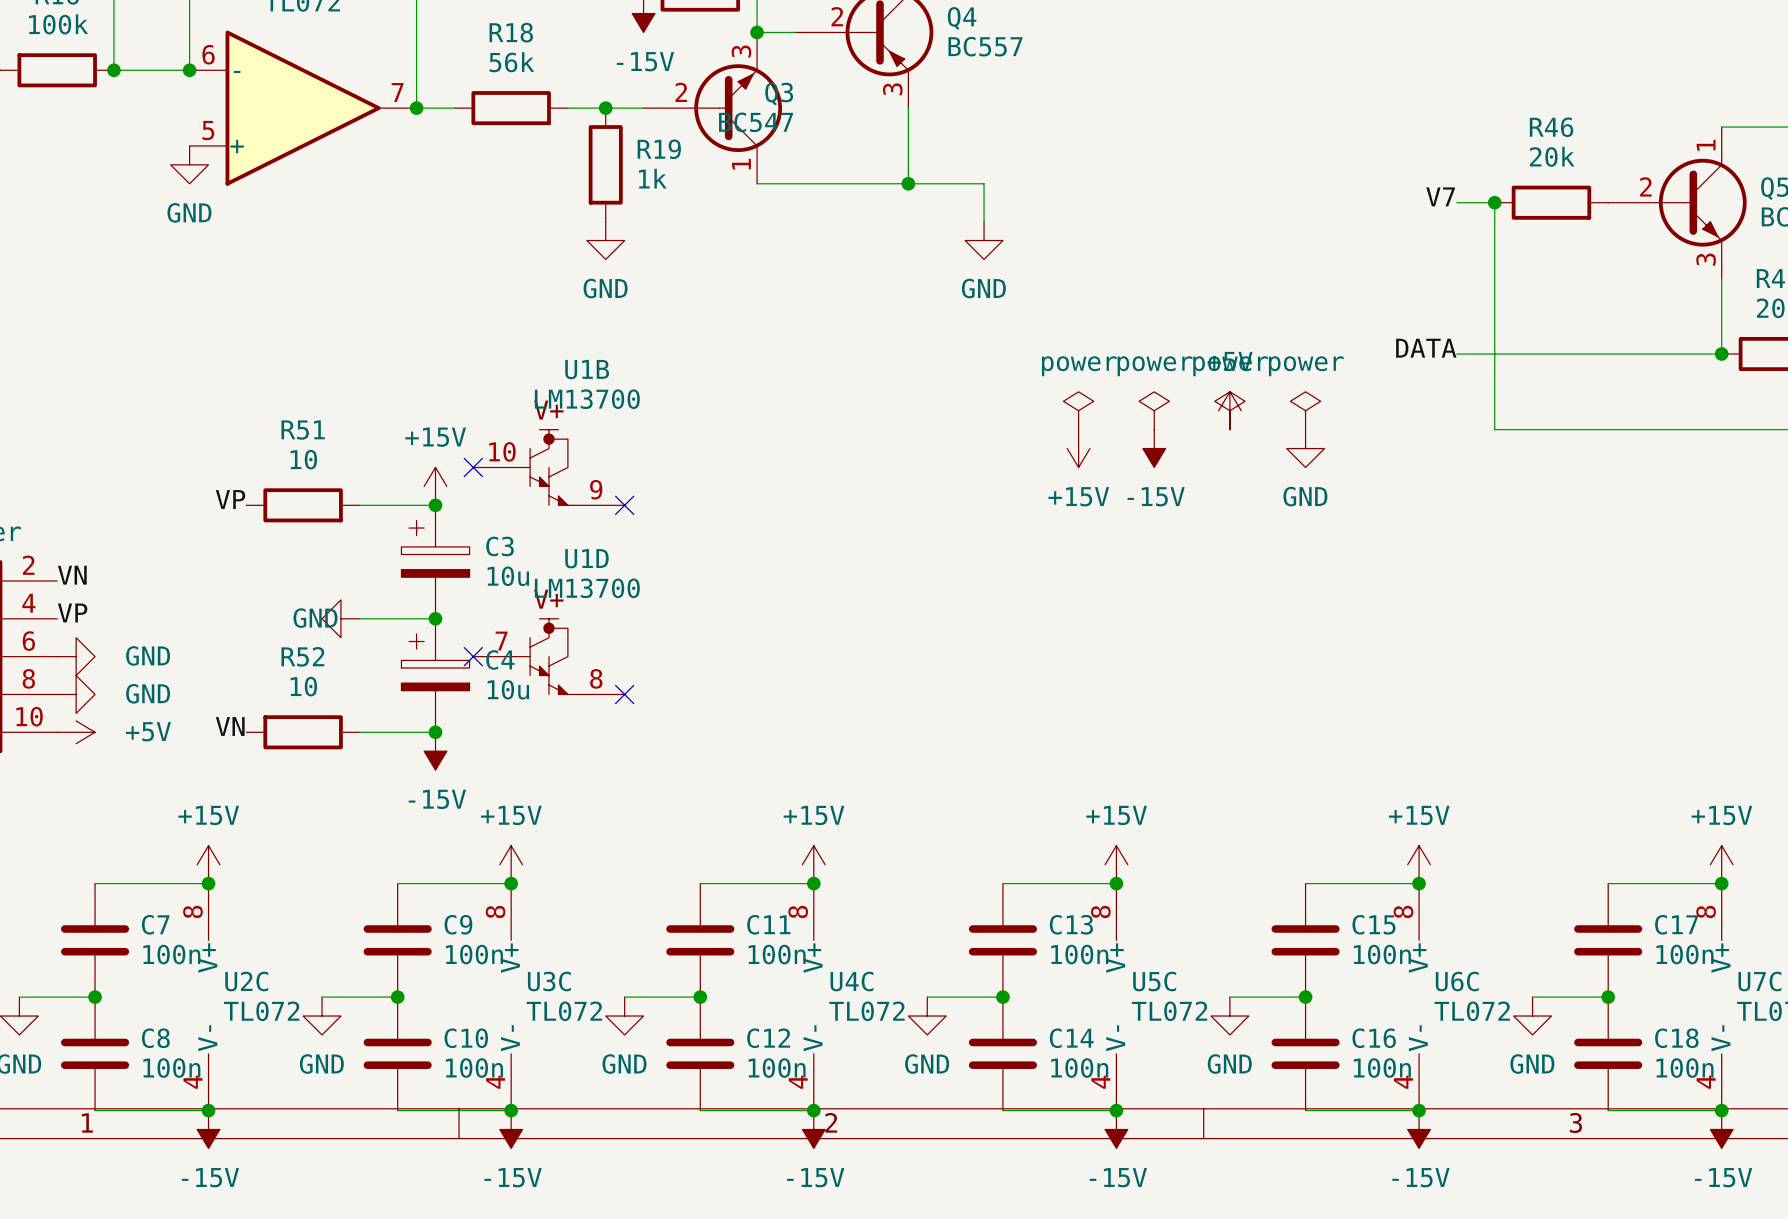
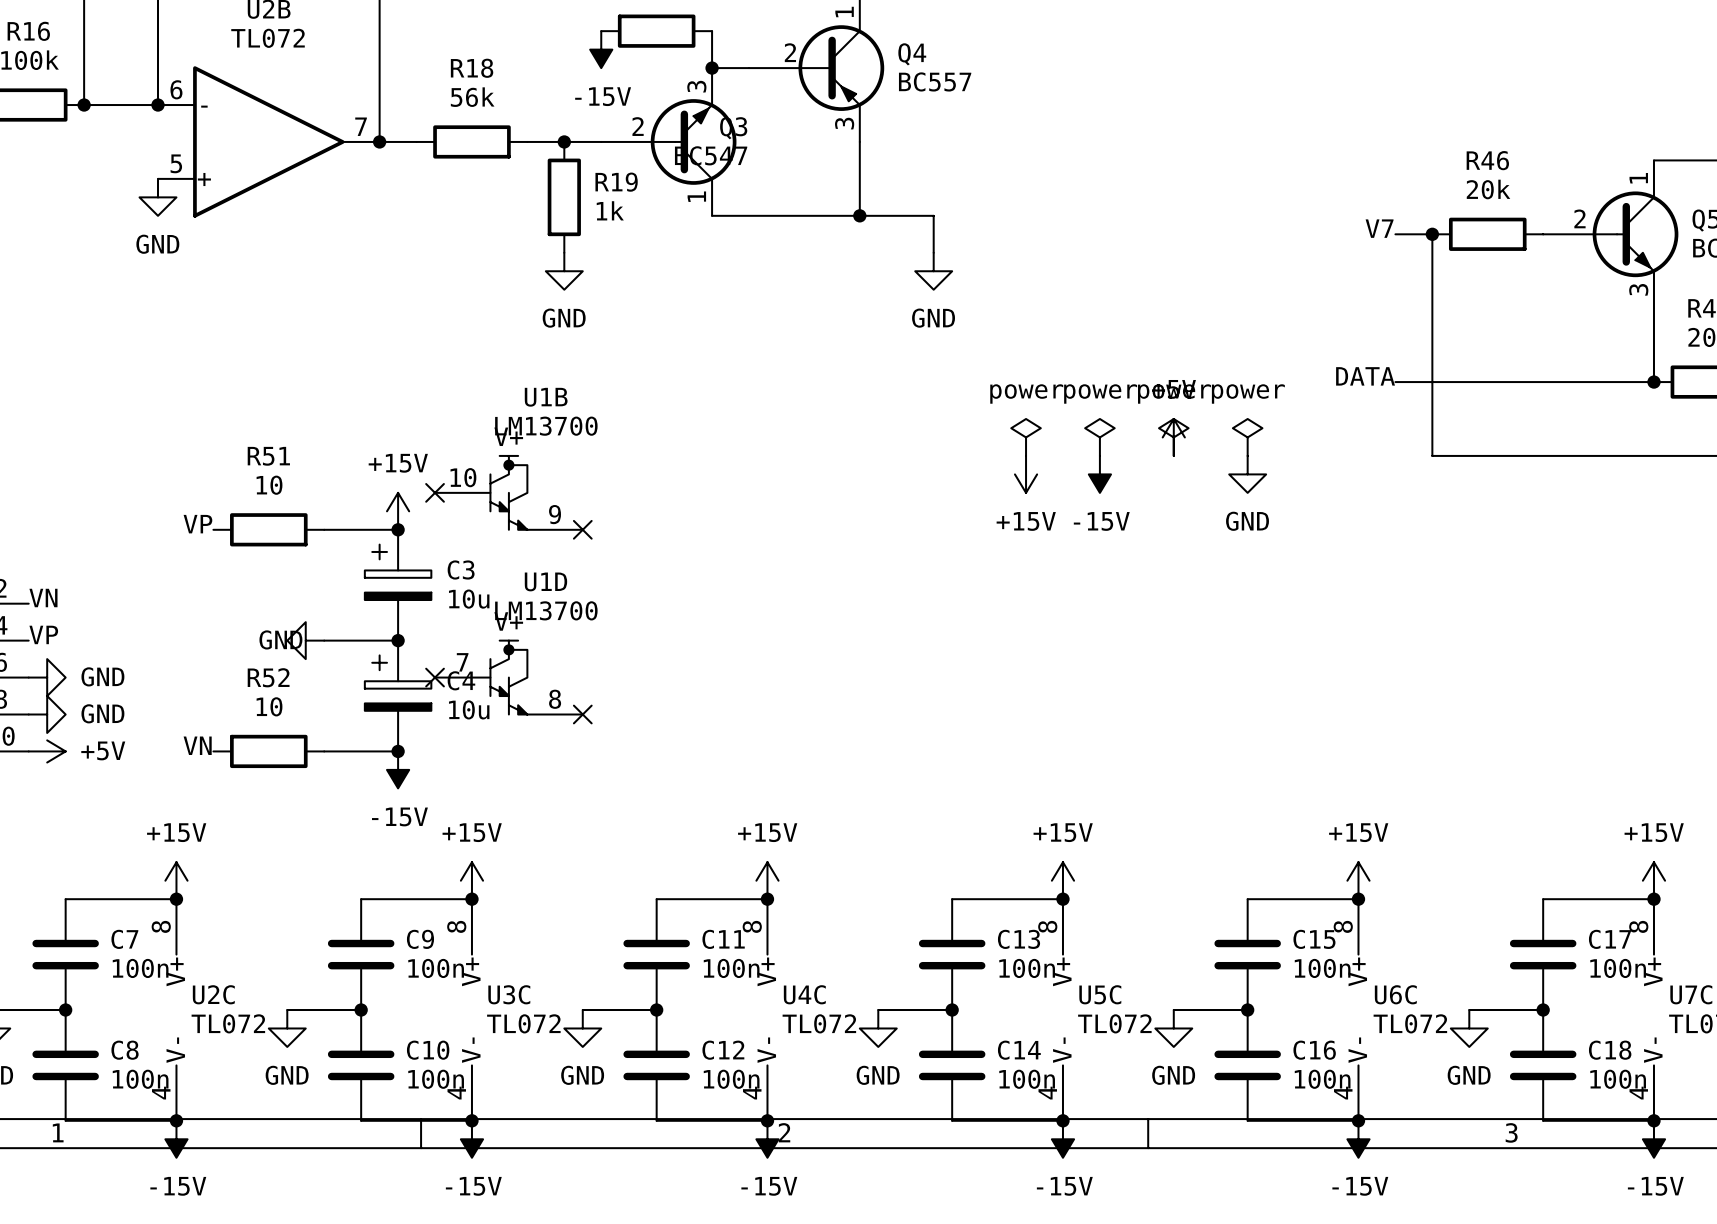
power symbol text position: GND (148, 655) -> GND (102, 676)
power symbol text position: GND (148, 693) -> GND (102, 713)
power symbol text position: +5V (148, 731) -> +5V (103, 750)

